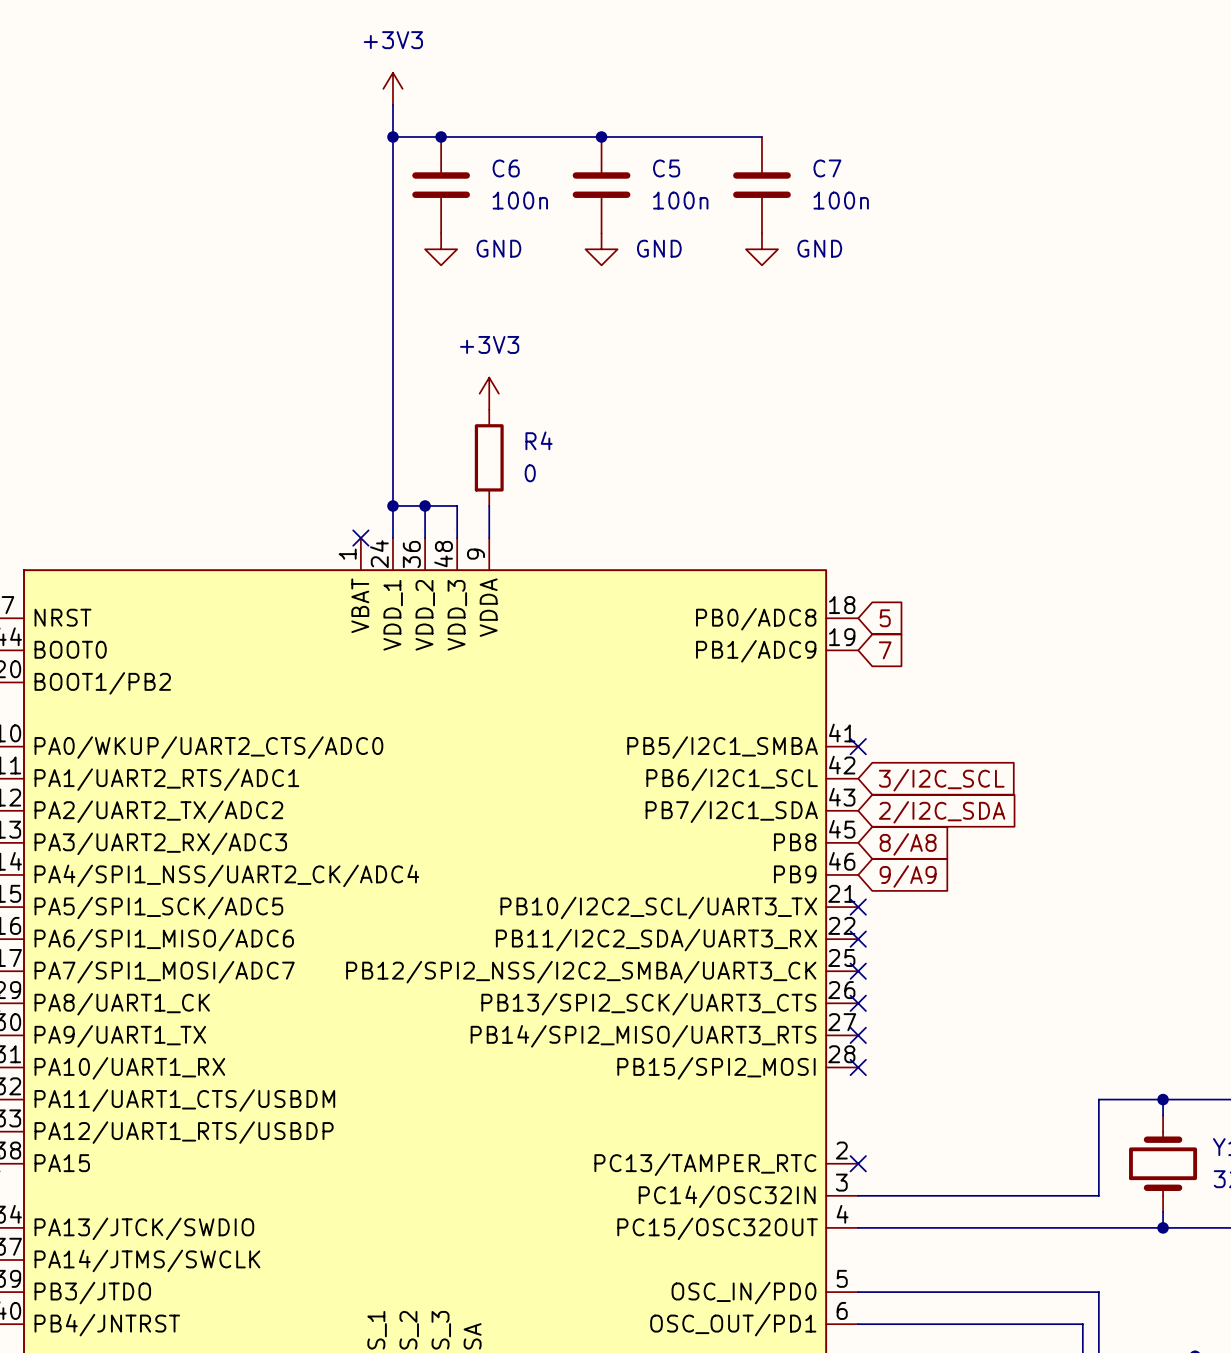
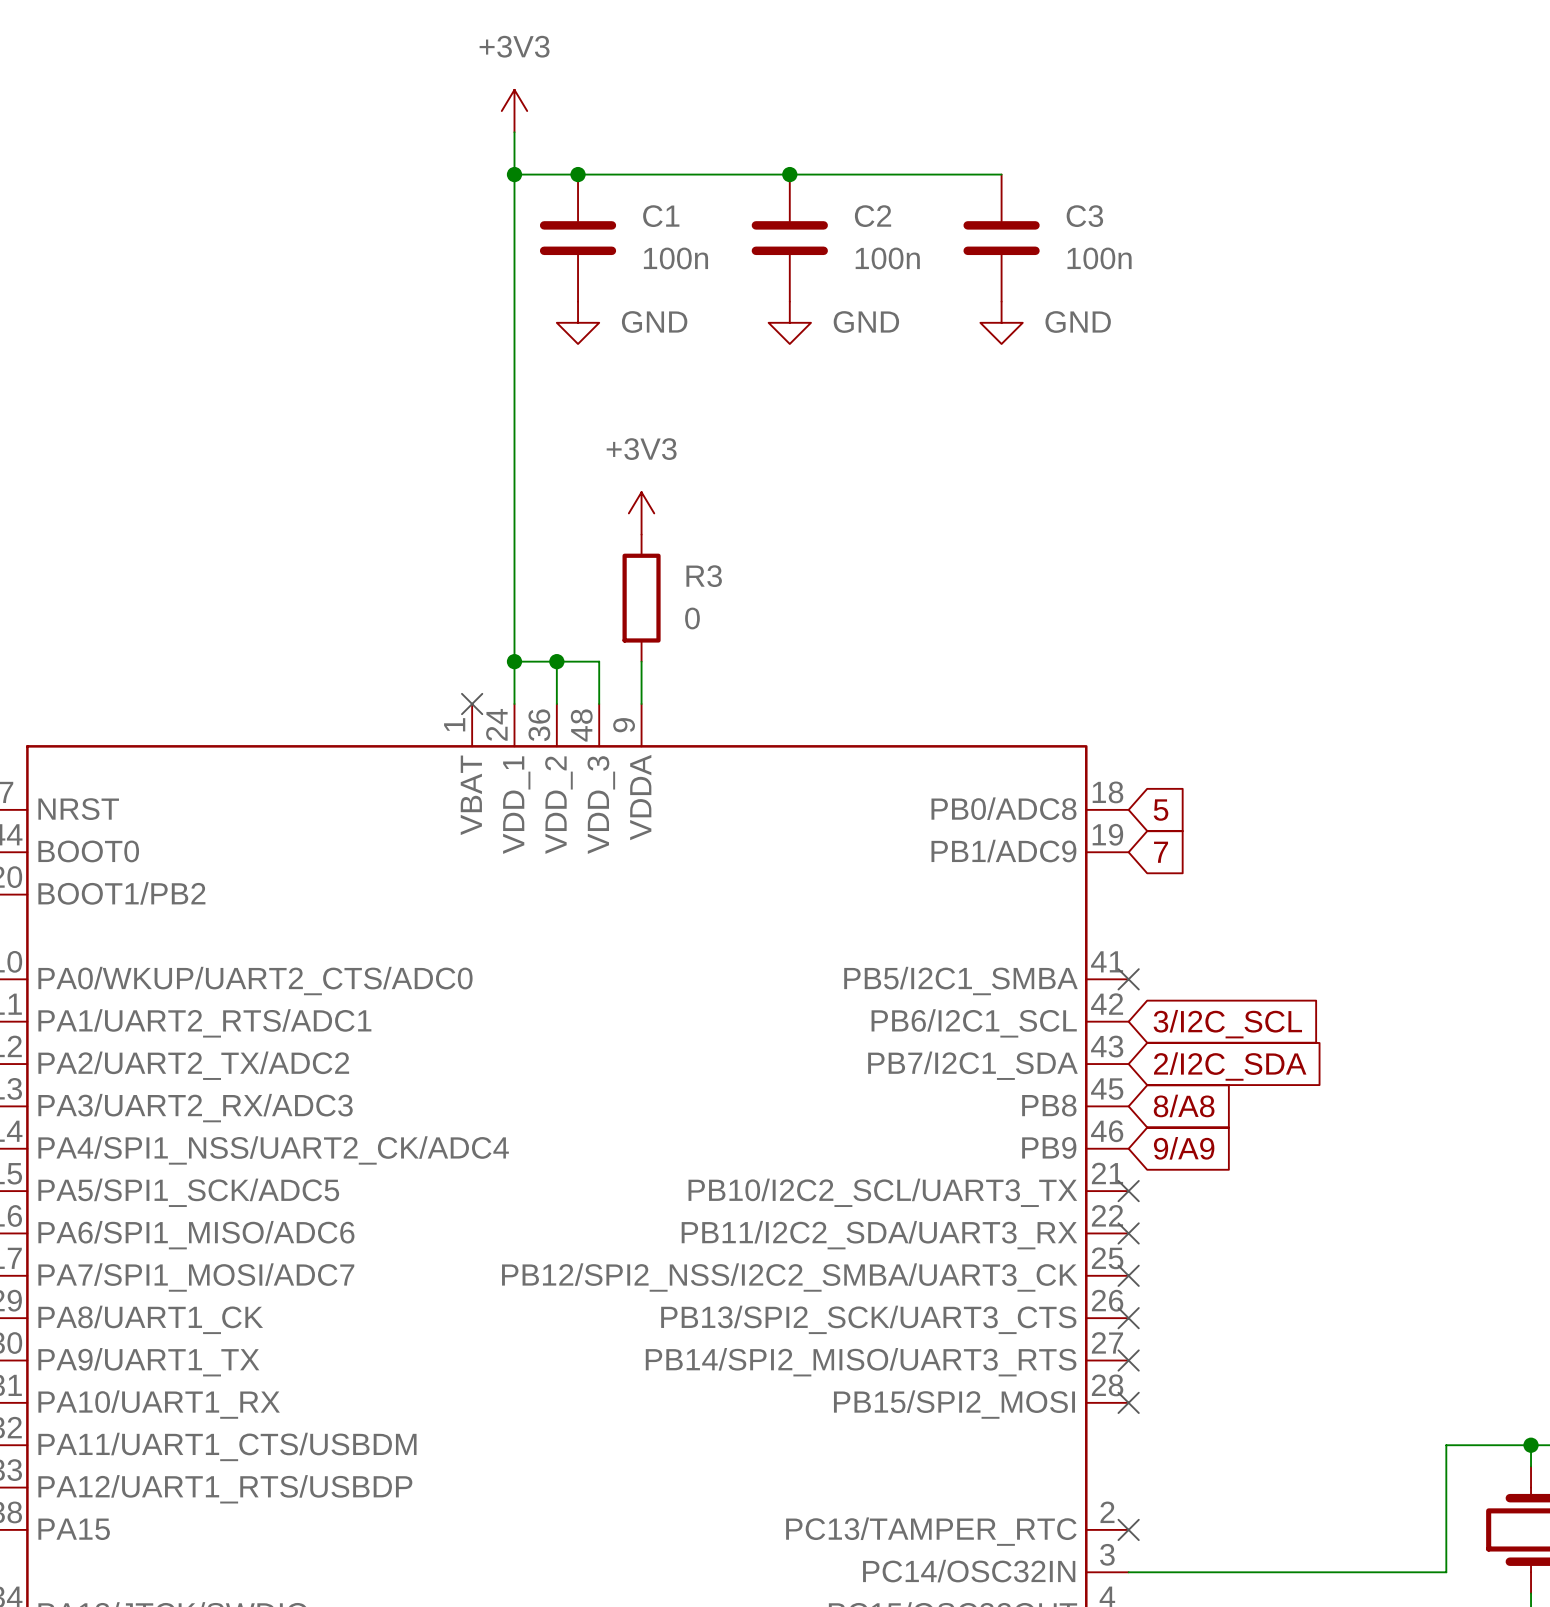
C6 name: C6 (506, 168) -> C1 (661, 216)
C5 name: C5 (666, 168) -> C2 (873, 216)
C7 name: C7 (827, 168) -> C3 (1084, 216)
R4 name: R4 (539, 440) -> R3 (704, 576)

